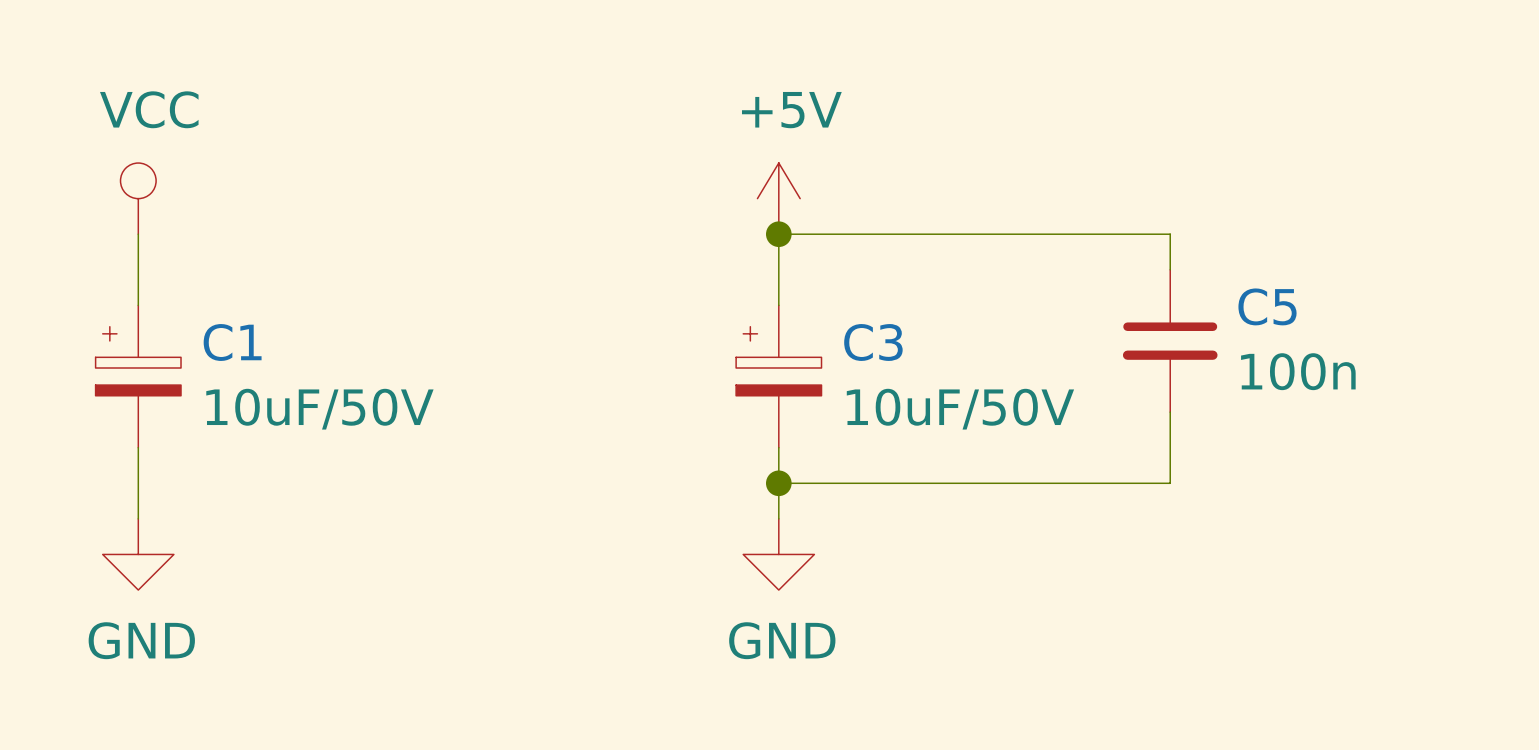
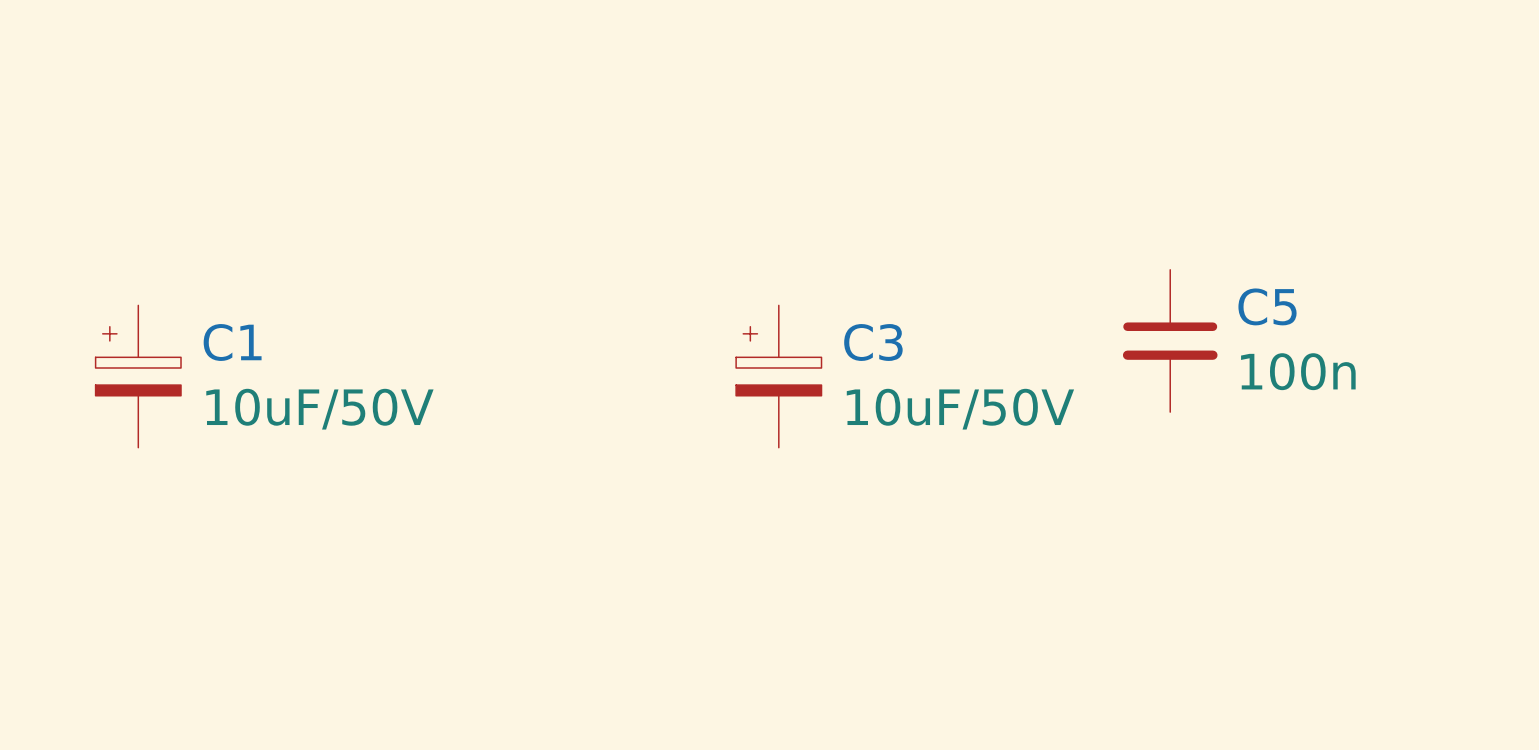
power symbol: VCC (138, 198) -> none
power symbol: +5V (778, 198) -> none
wire: (138, 234) (138, 305) -> none
junction: (778, 234) -> none
wire: (1170, 269) (1170, 234) (778, 234) (778, 305) -> none
wire: (1170, 412) (1170, 483) (778, 483) -> none
wire: (138, 447) (138, 518) -> none
wire: (778, 447) (778, 518) -> none
junction: (778, 483) -> none
power symbol: GND (138, 554) -> none
power symbol: GND (778, 554) -> none

